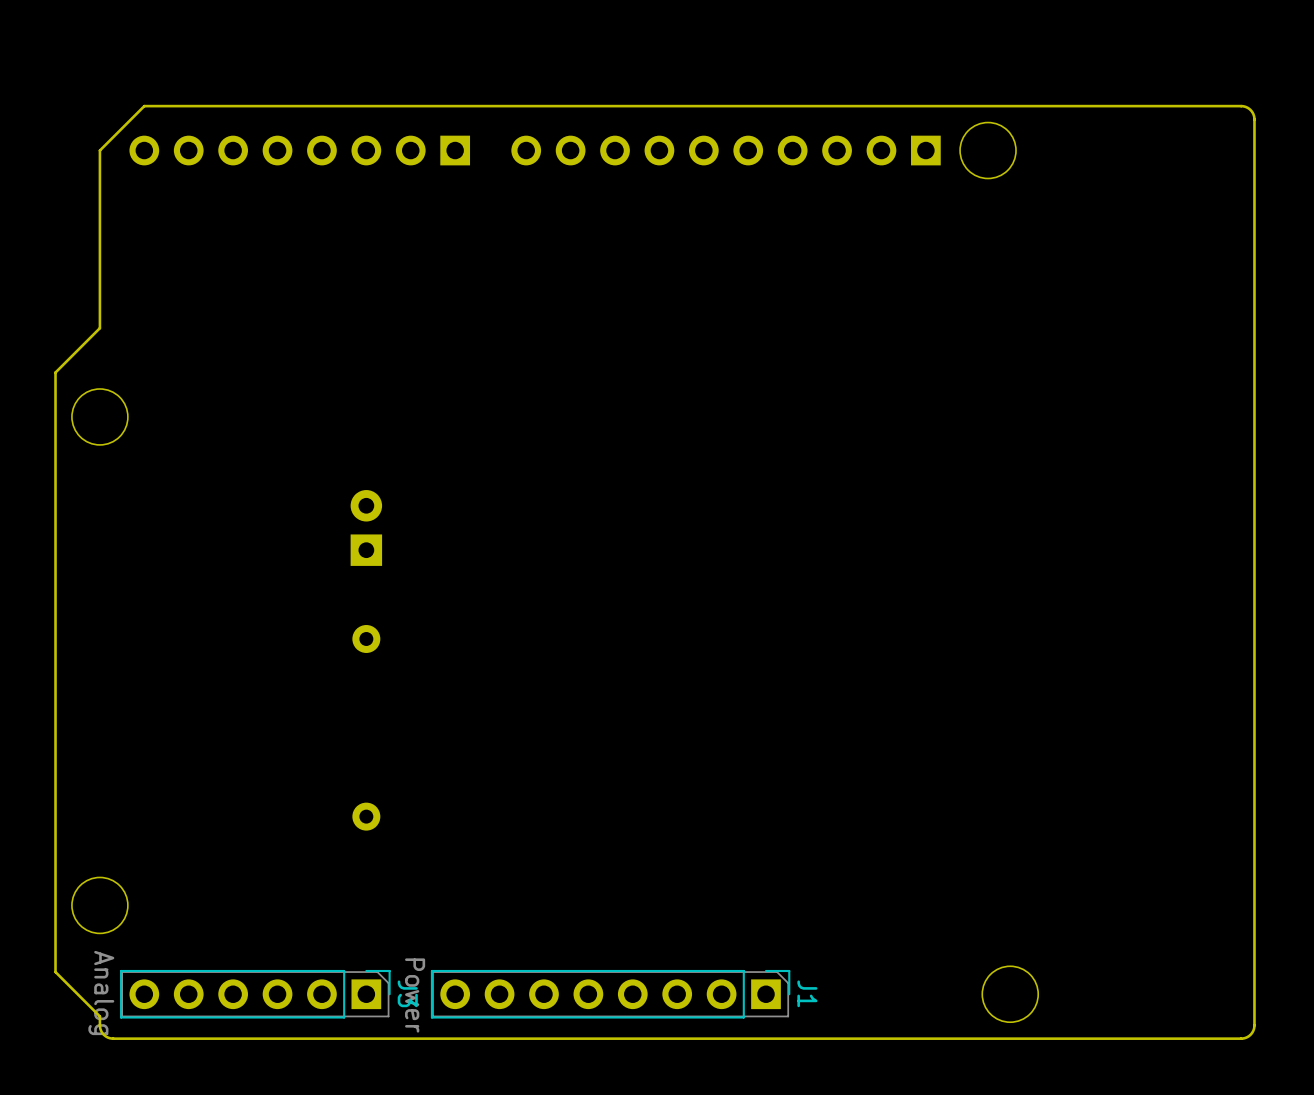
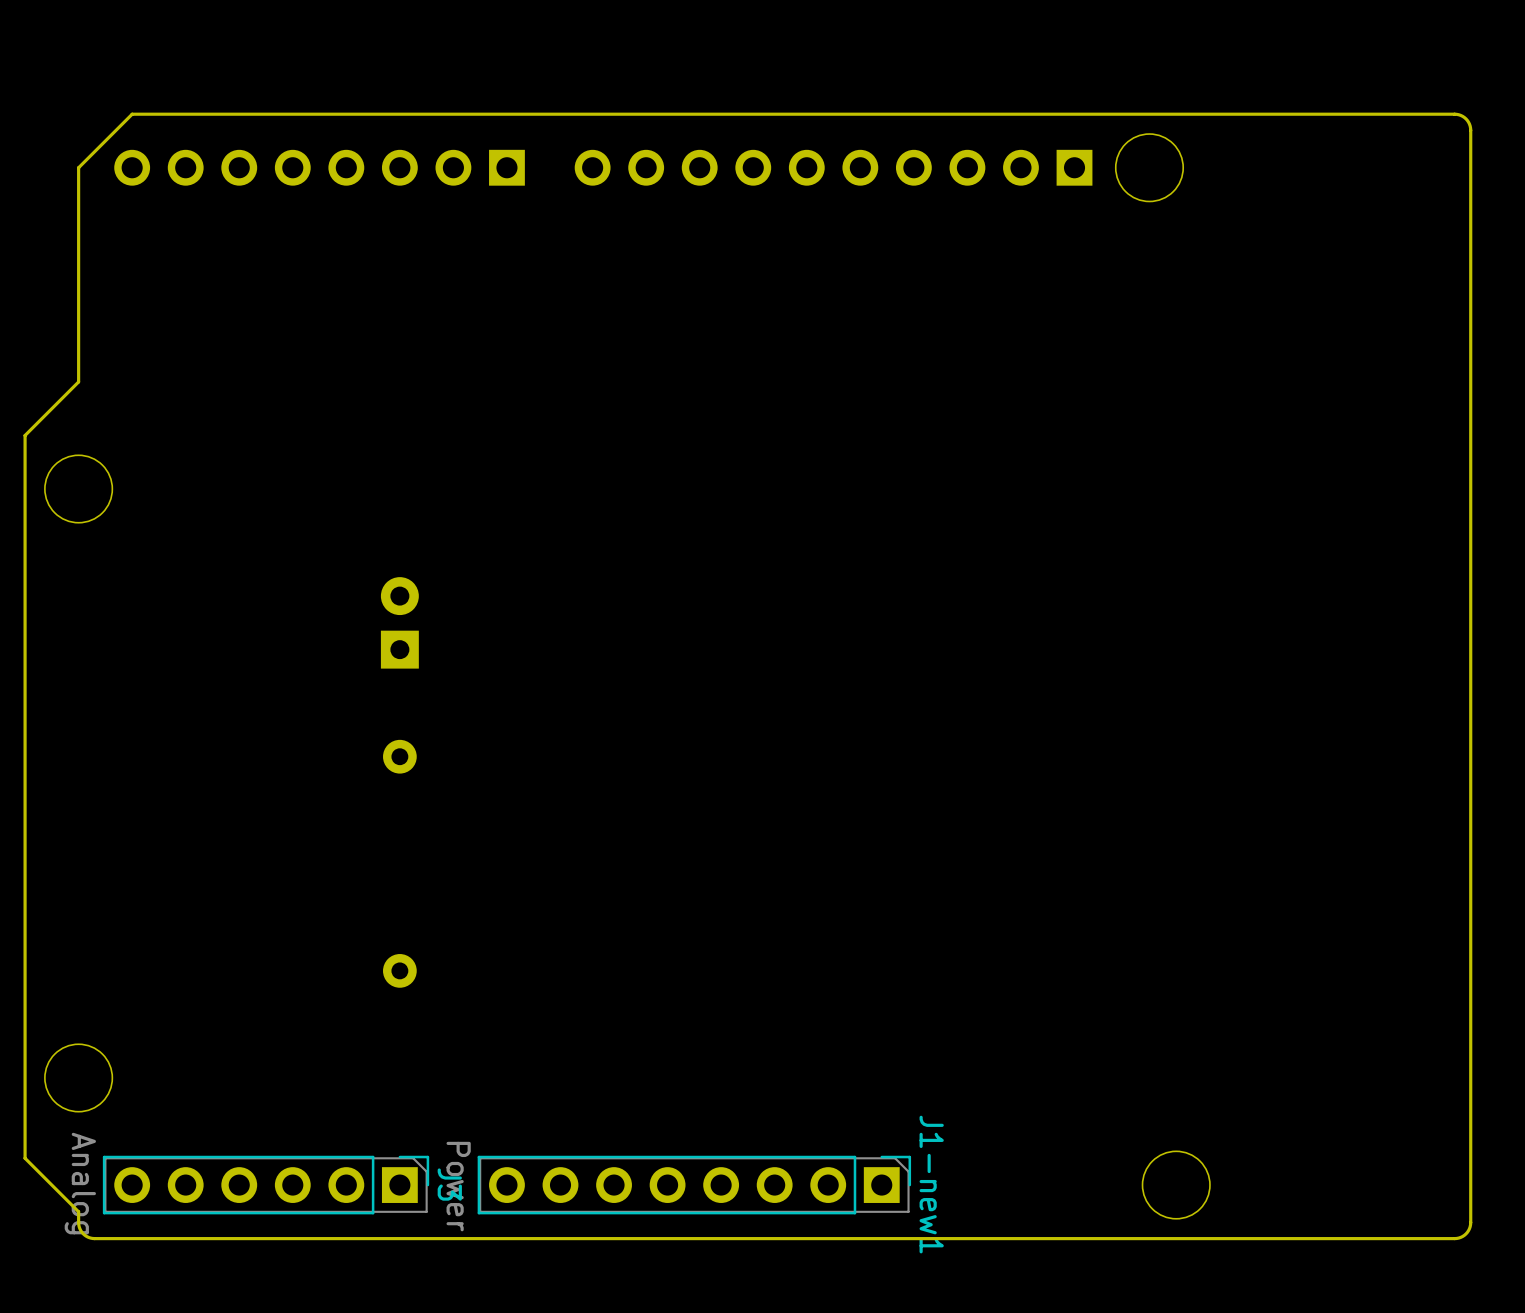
J1 name: J1 (807, 993) -> J1-new1 (931, 1184)

